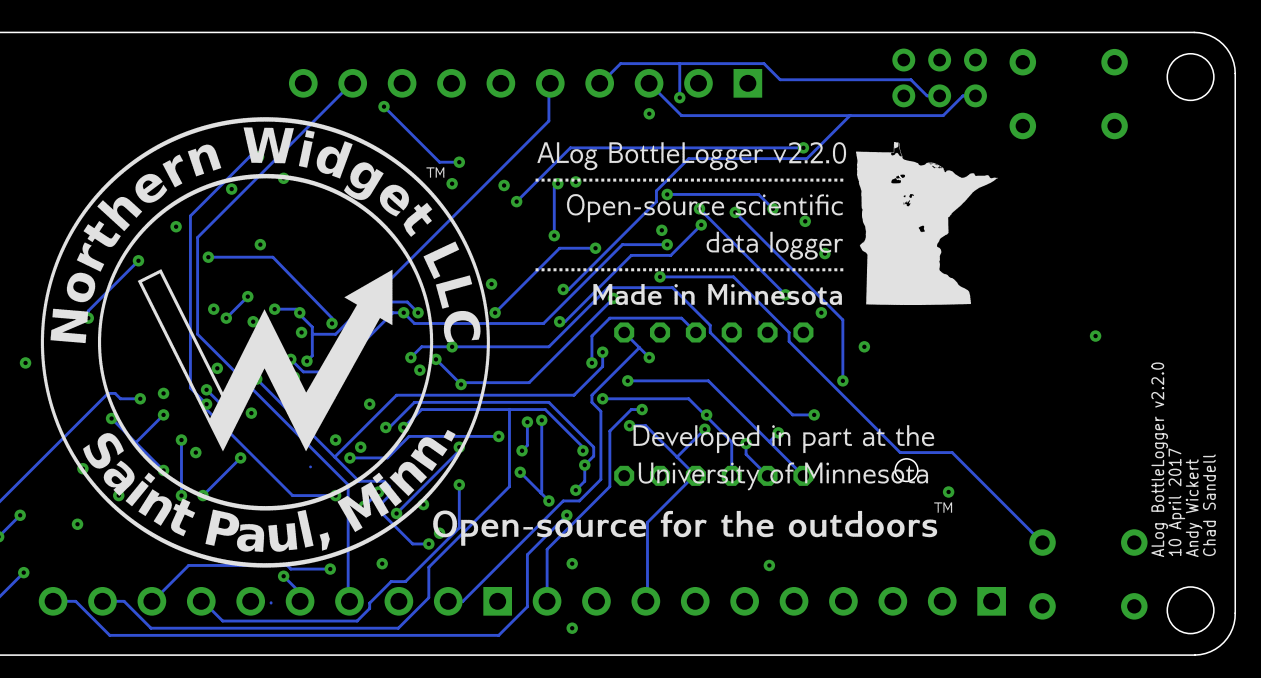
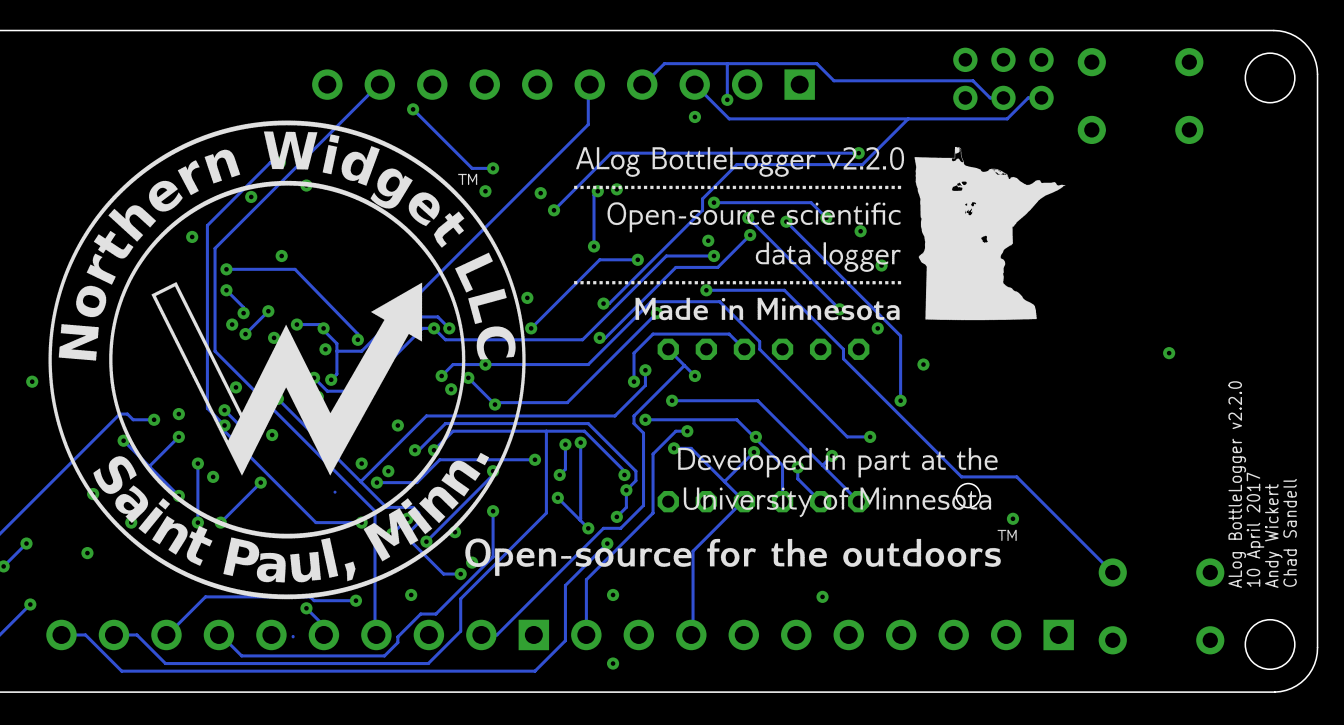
track: (138, 260) (88, 310) (88, 318) -> none
via: (138, 260) -> none
track: none -> (226, 290) (243, 307) (243, 313)
via: none -> (226, 290)
via: none -> (243, 313)
via: (88, 318) -> none

